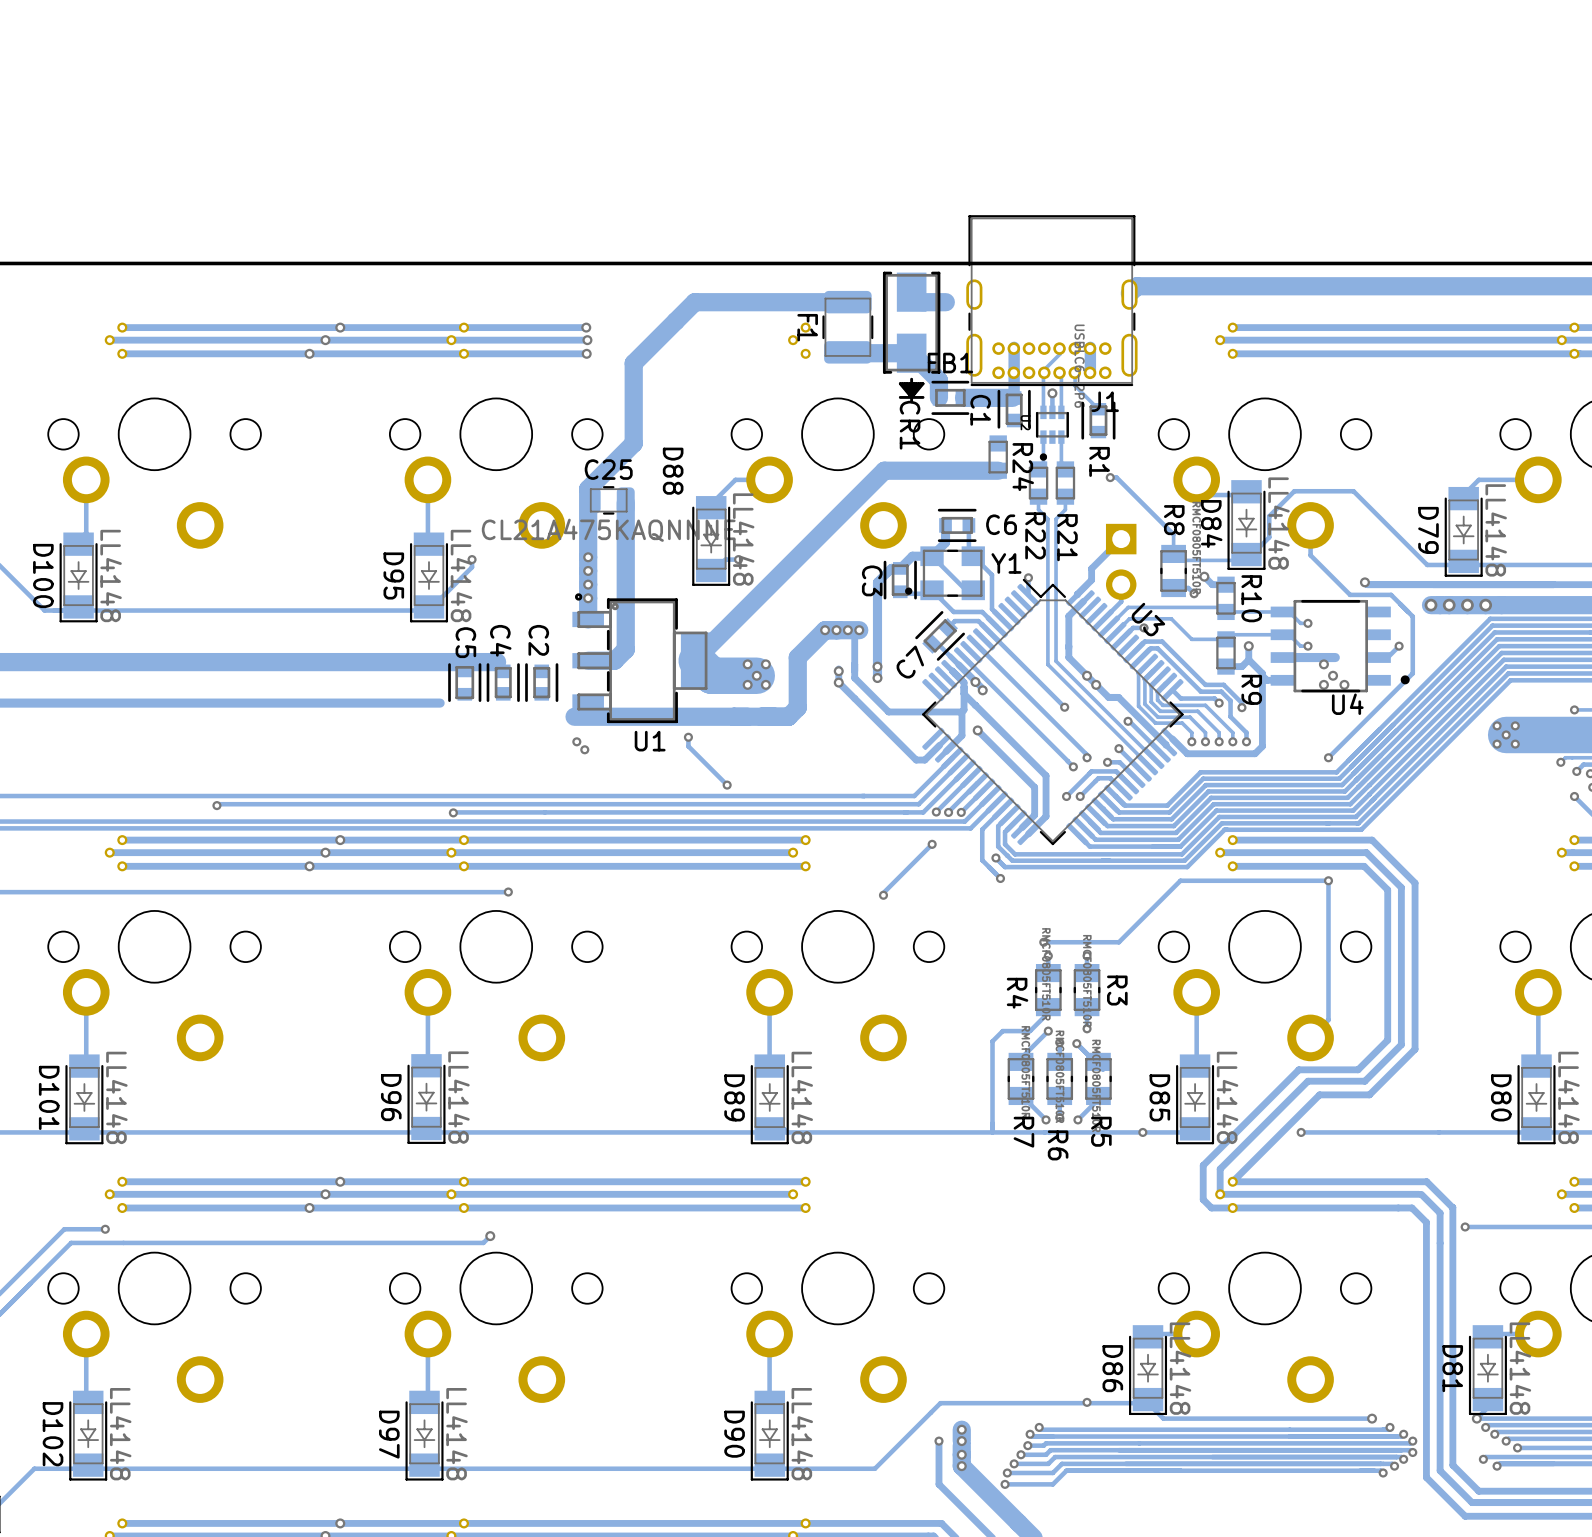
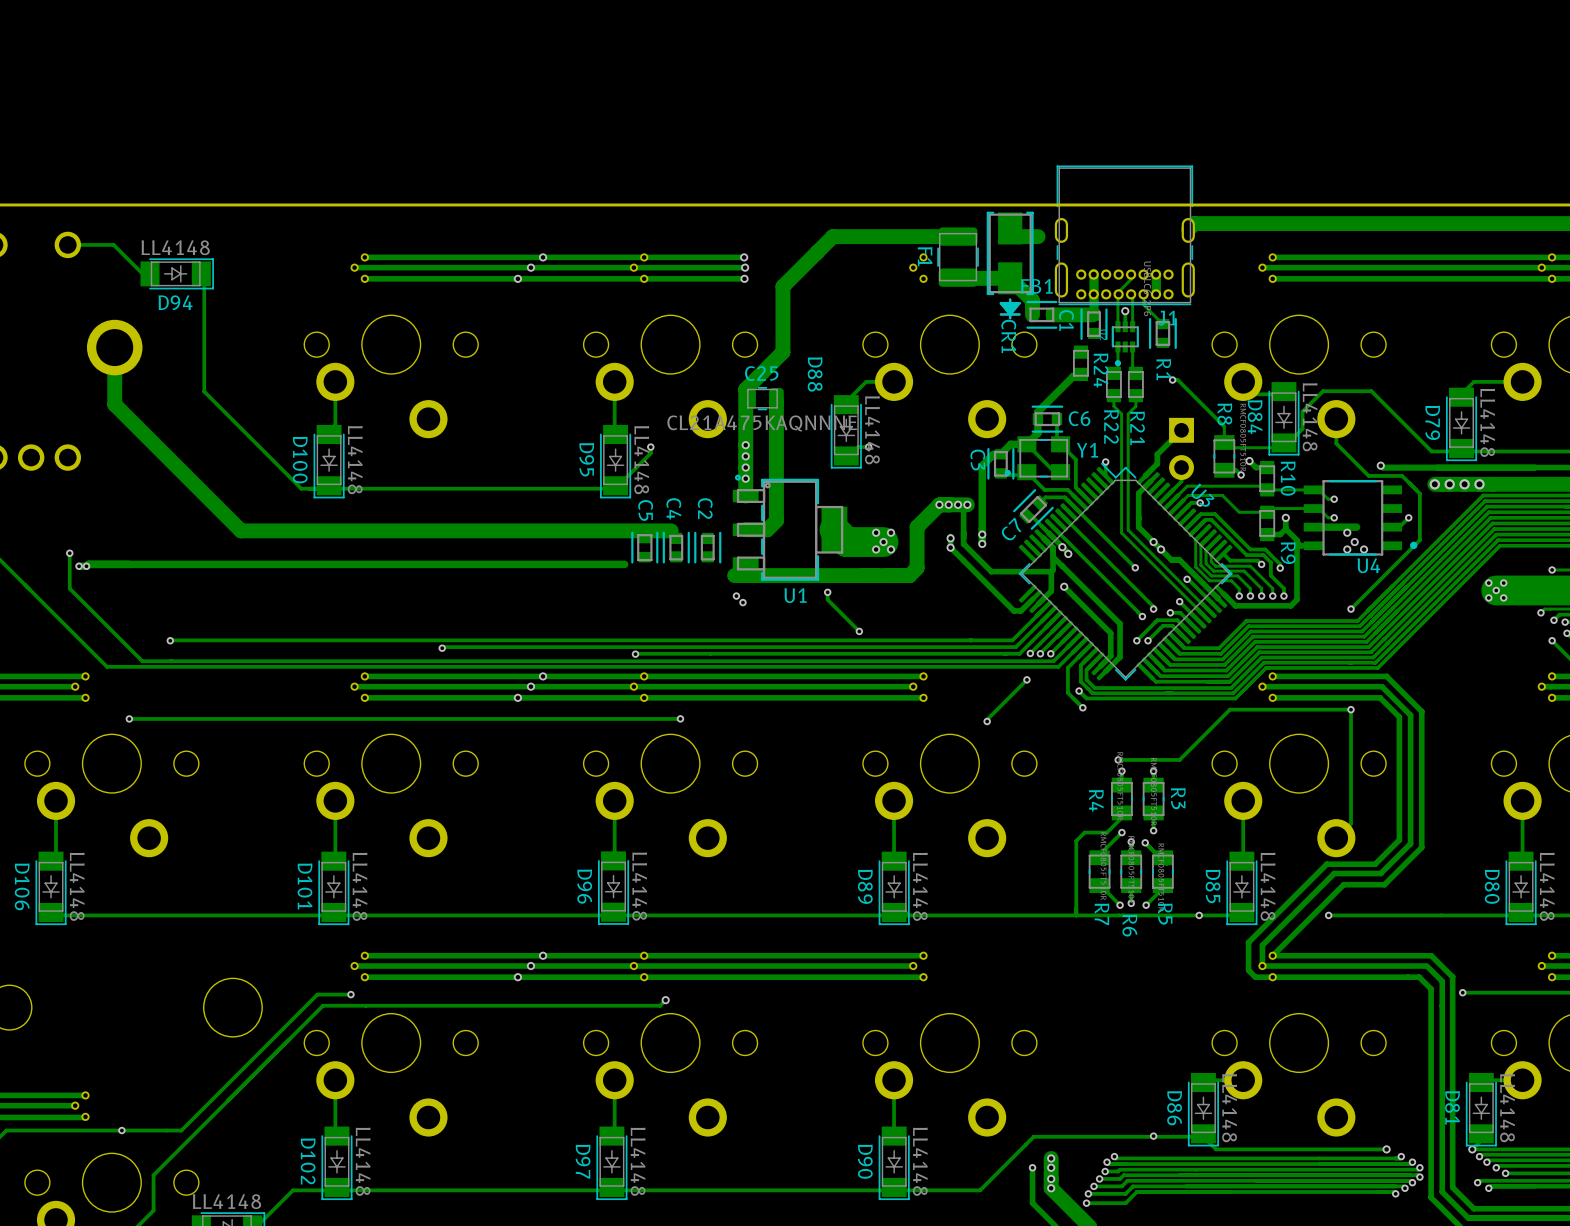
track: (998, 470) (884, 470) (696, 658) (696, 660) -> none
track: none -> (1082, 376) (1073, 376) (1037, 411) (1037, 419)

